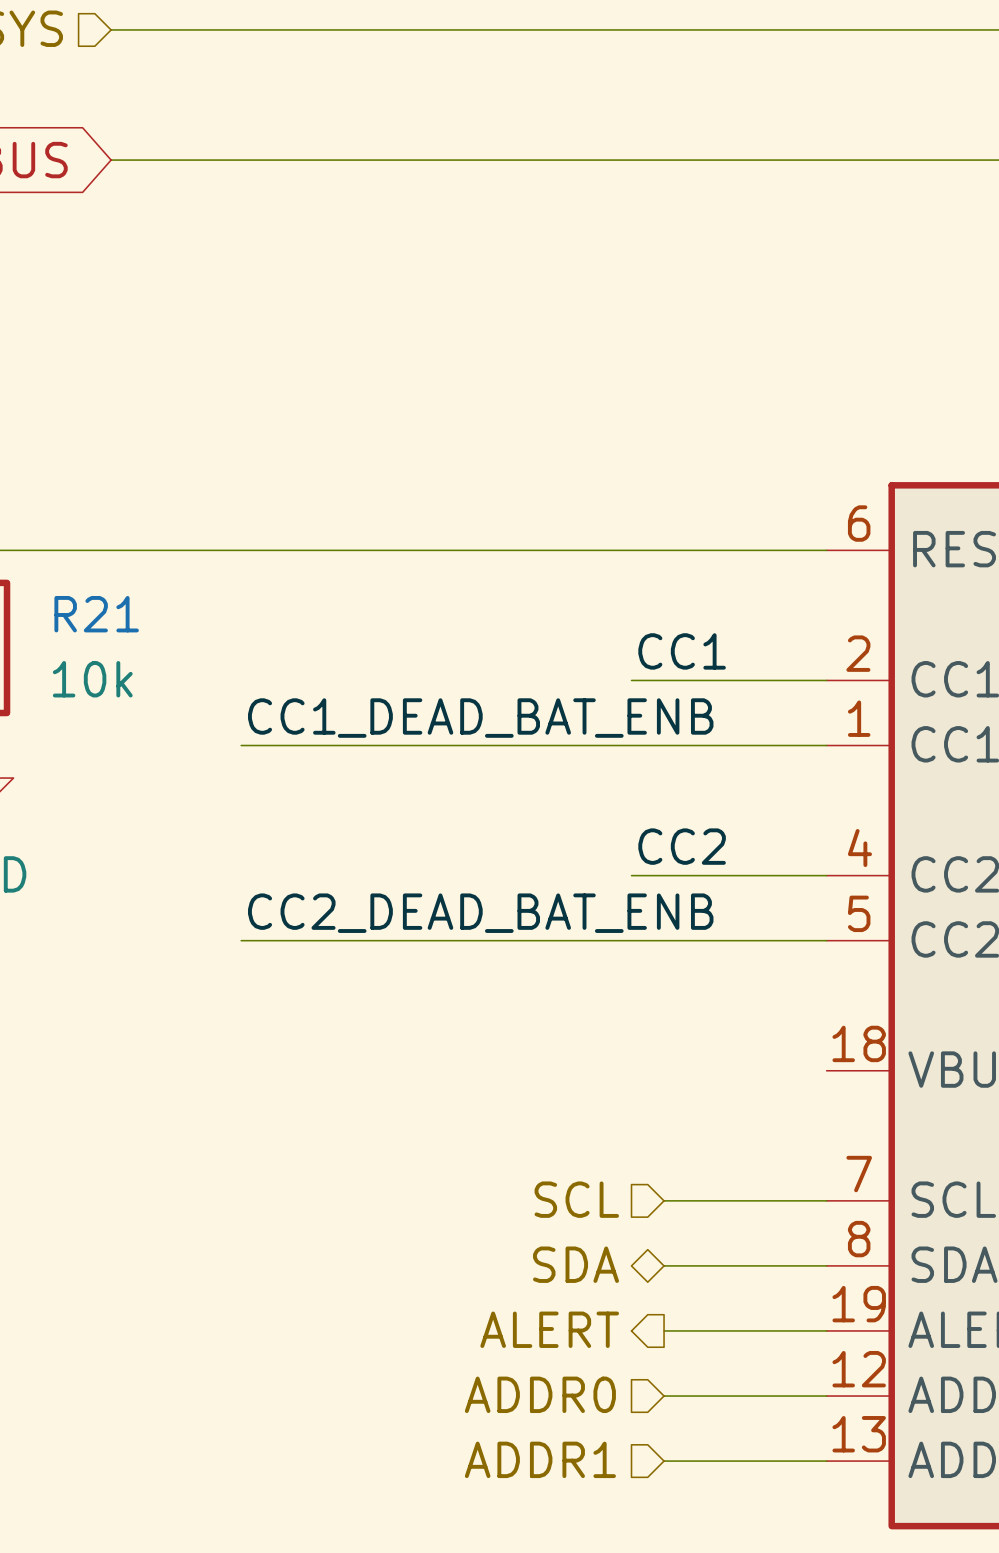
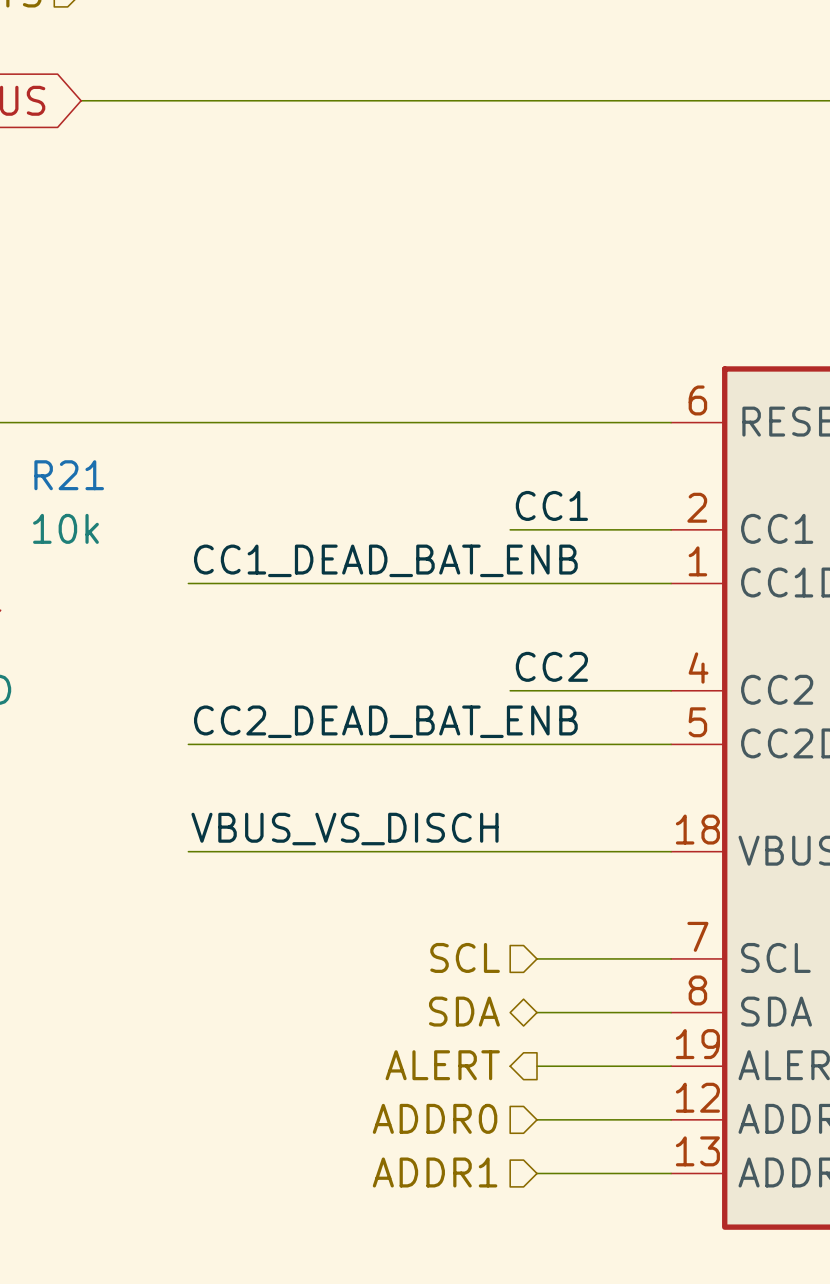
label: none -> VBUS_VS_DISCH (345, 829)
wire: none -> (188, 851) (671, 851)

